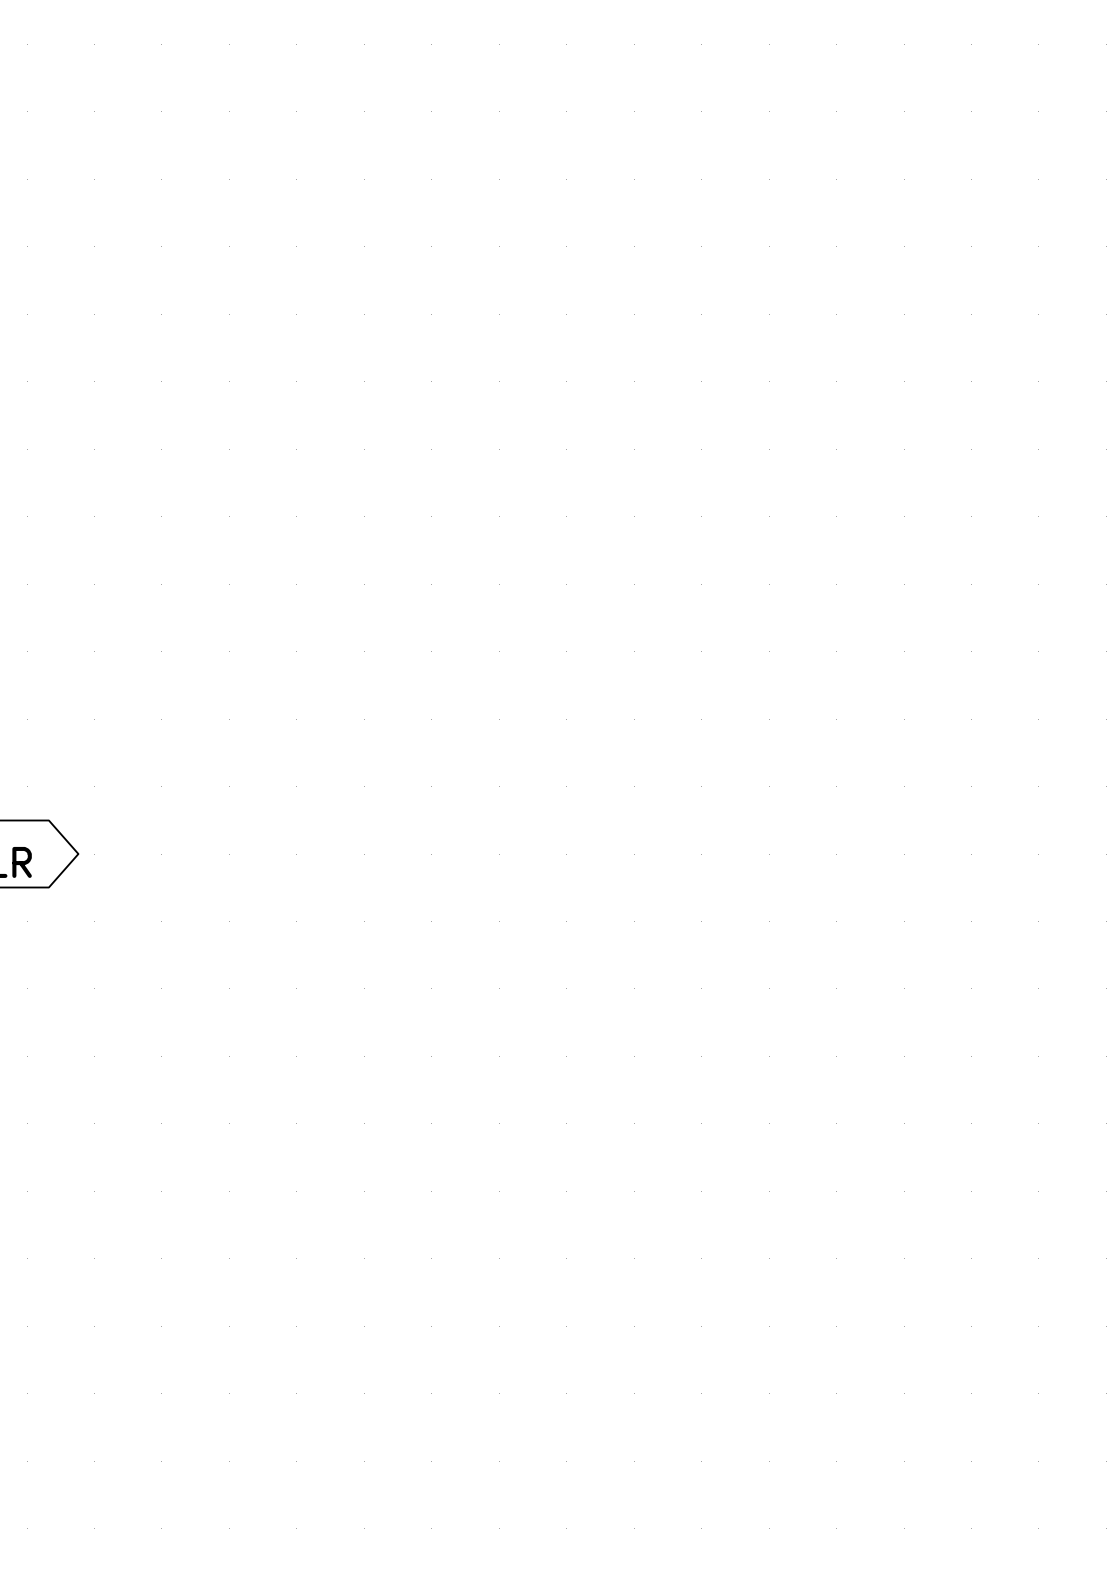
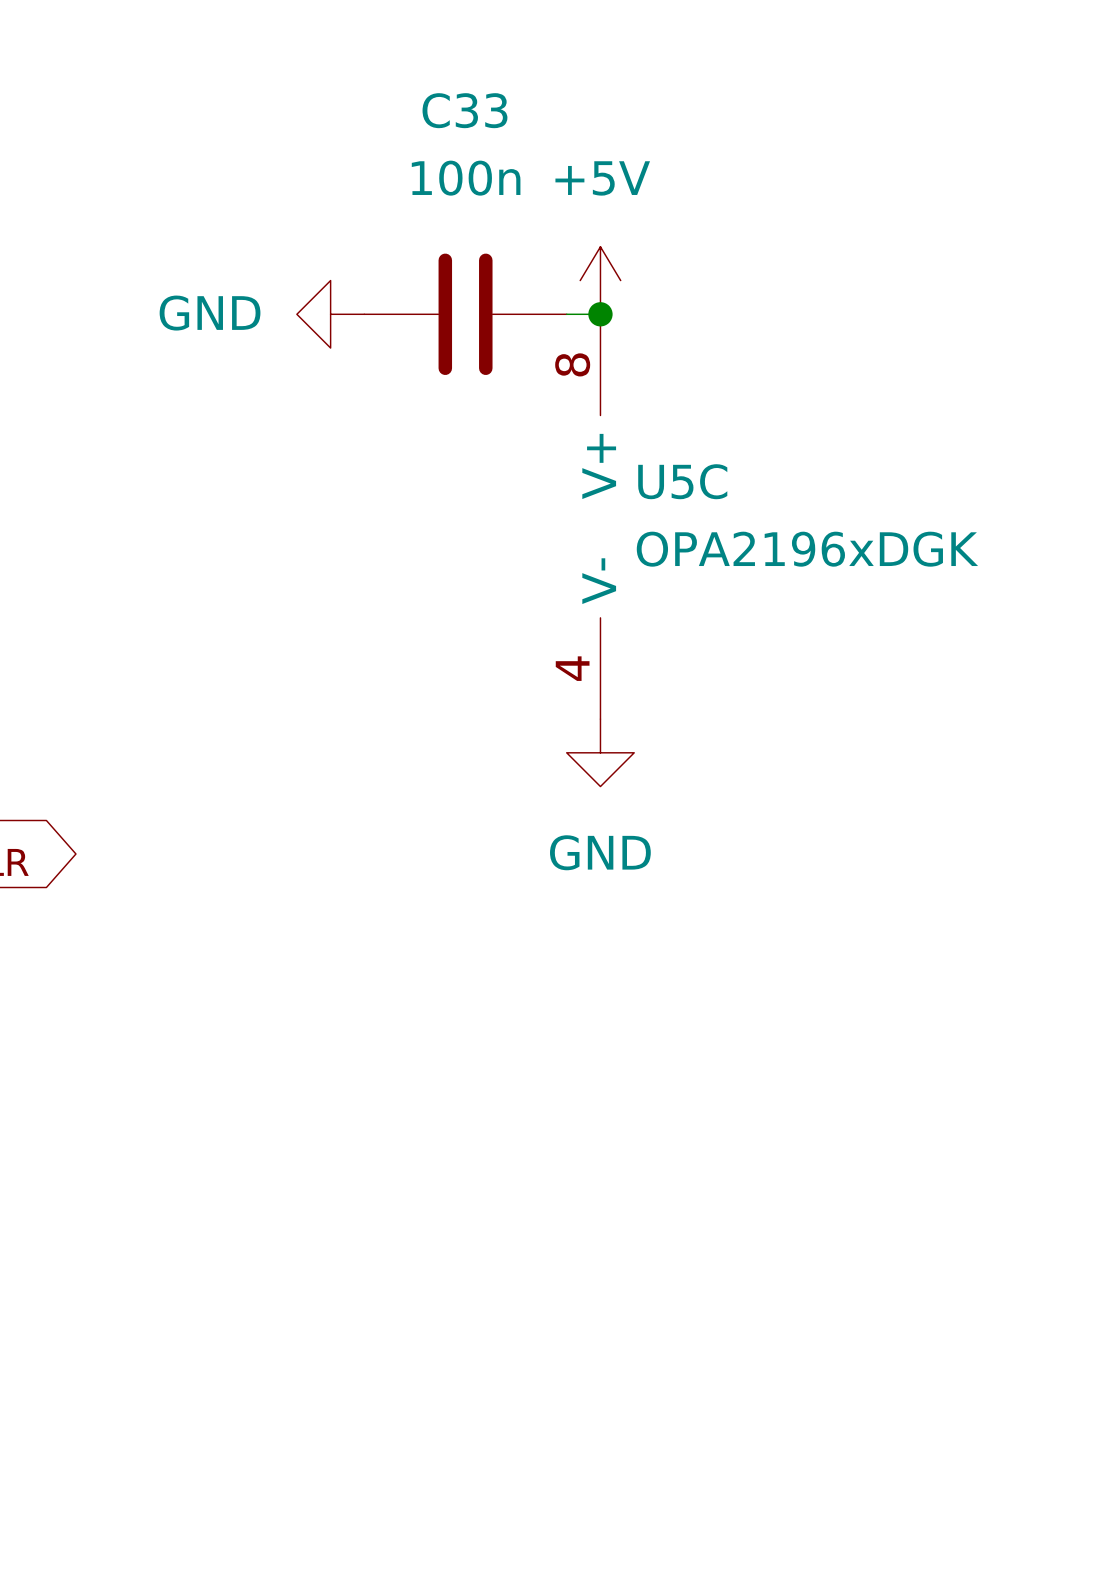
power symbol: none -> +5V (600, 280)
power symbol: none -> GND (330, 314)
C33: none -> 100n (465, 314)
wire: none -> (566, 314) (600, 314)
junction: none -> (600, 314)
U5C: none -> OPA2196xDGK (600, 516)
power symbol: none -> GND (600, 752)

